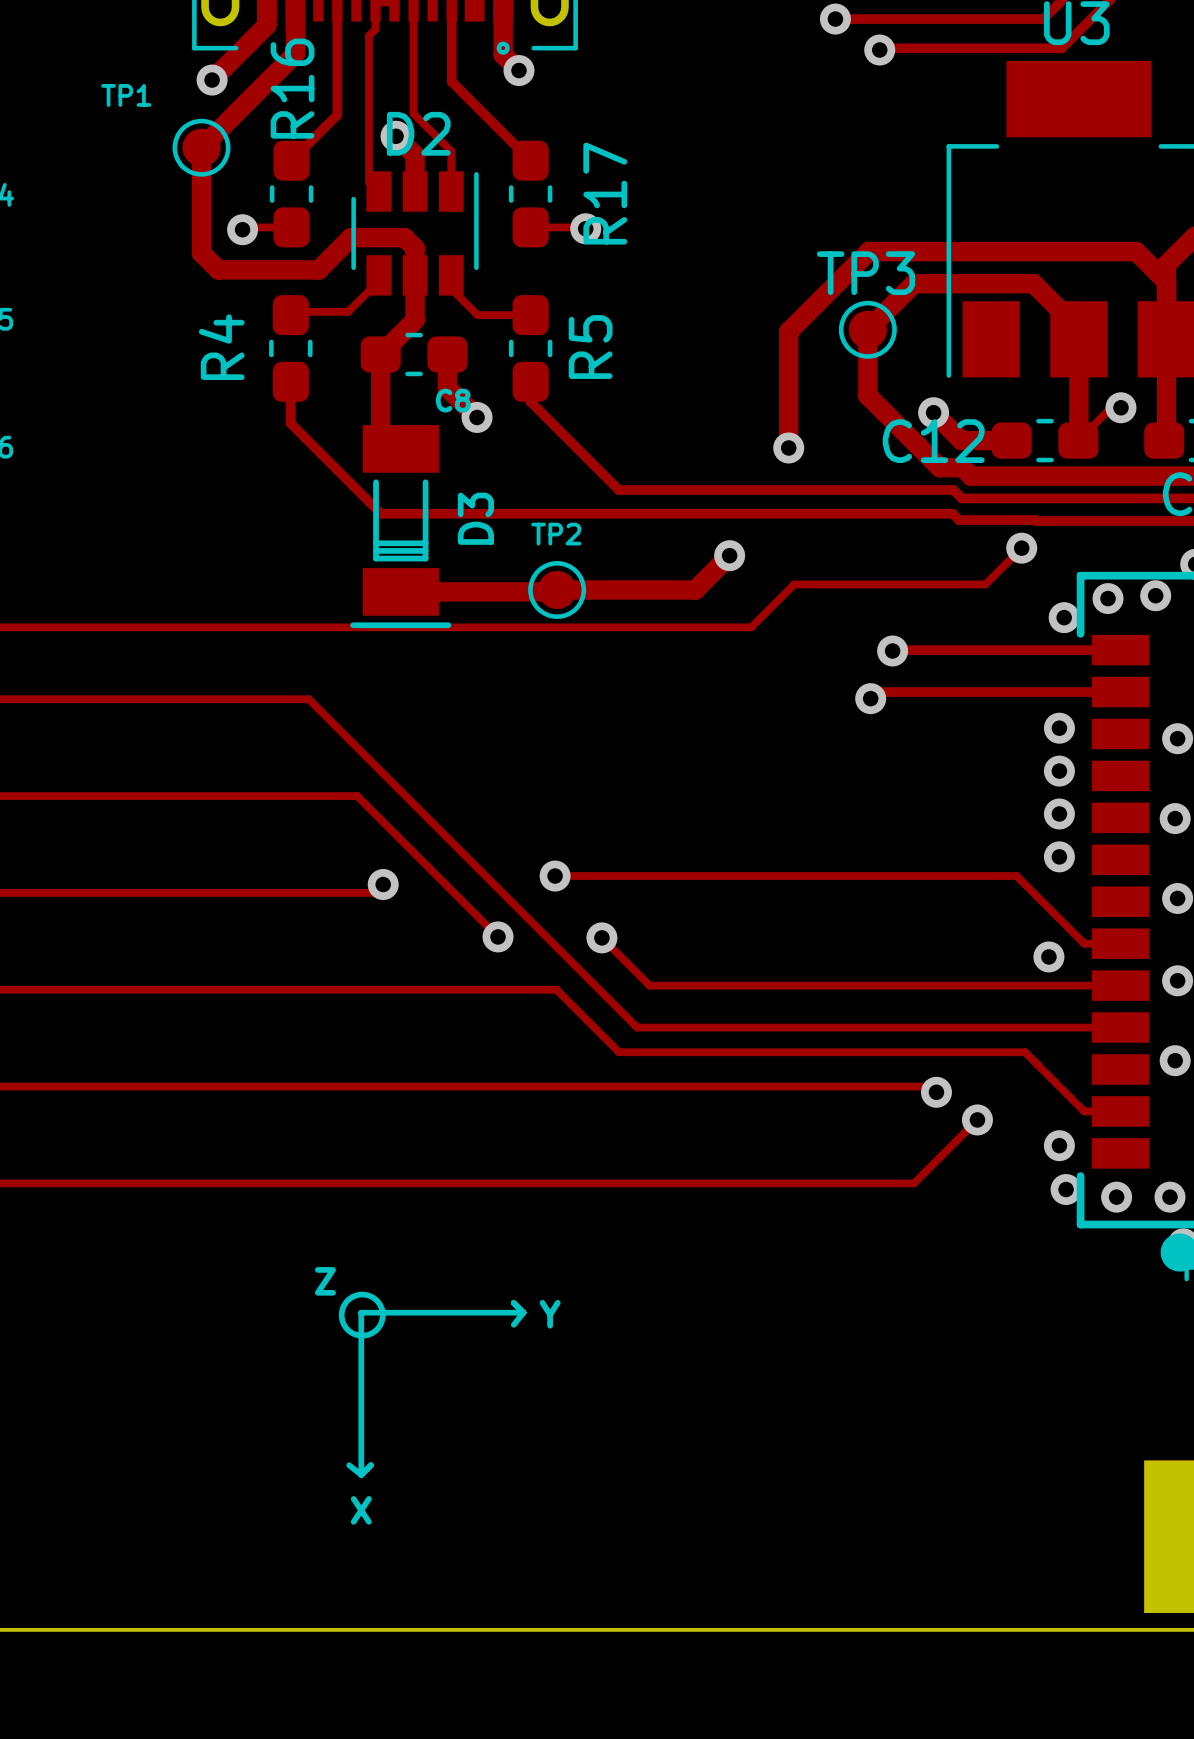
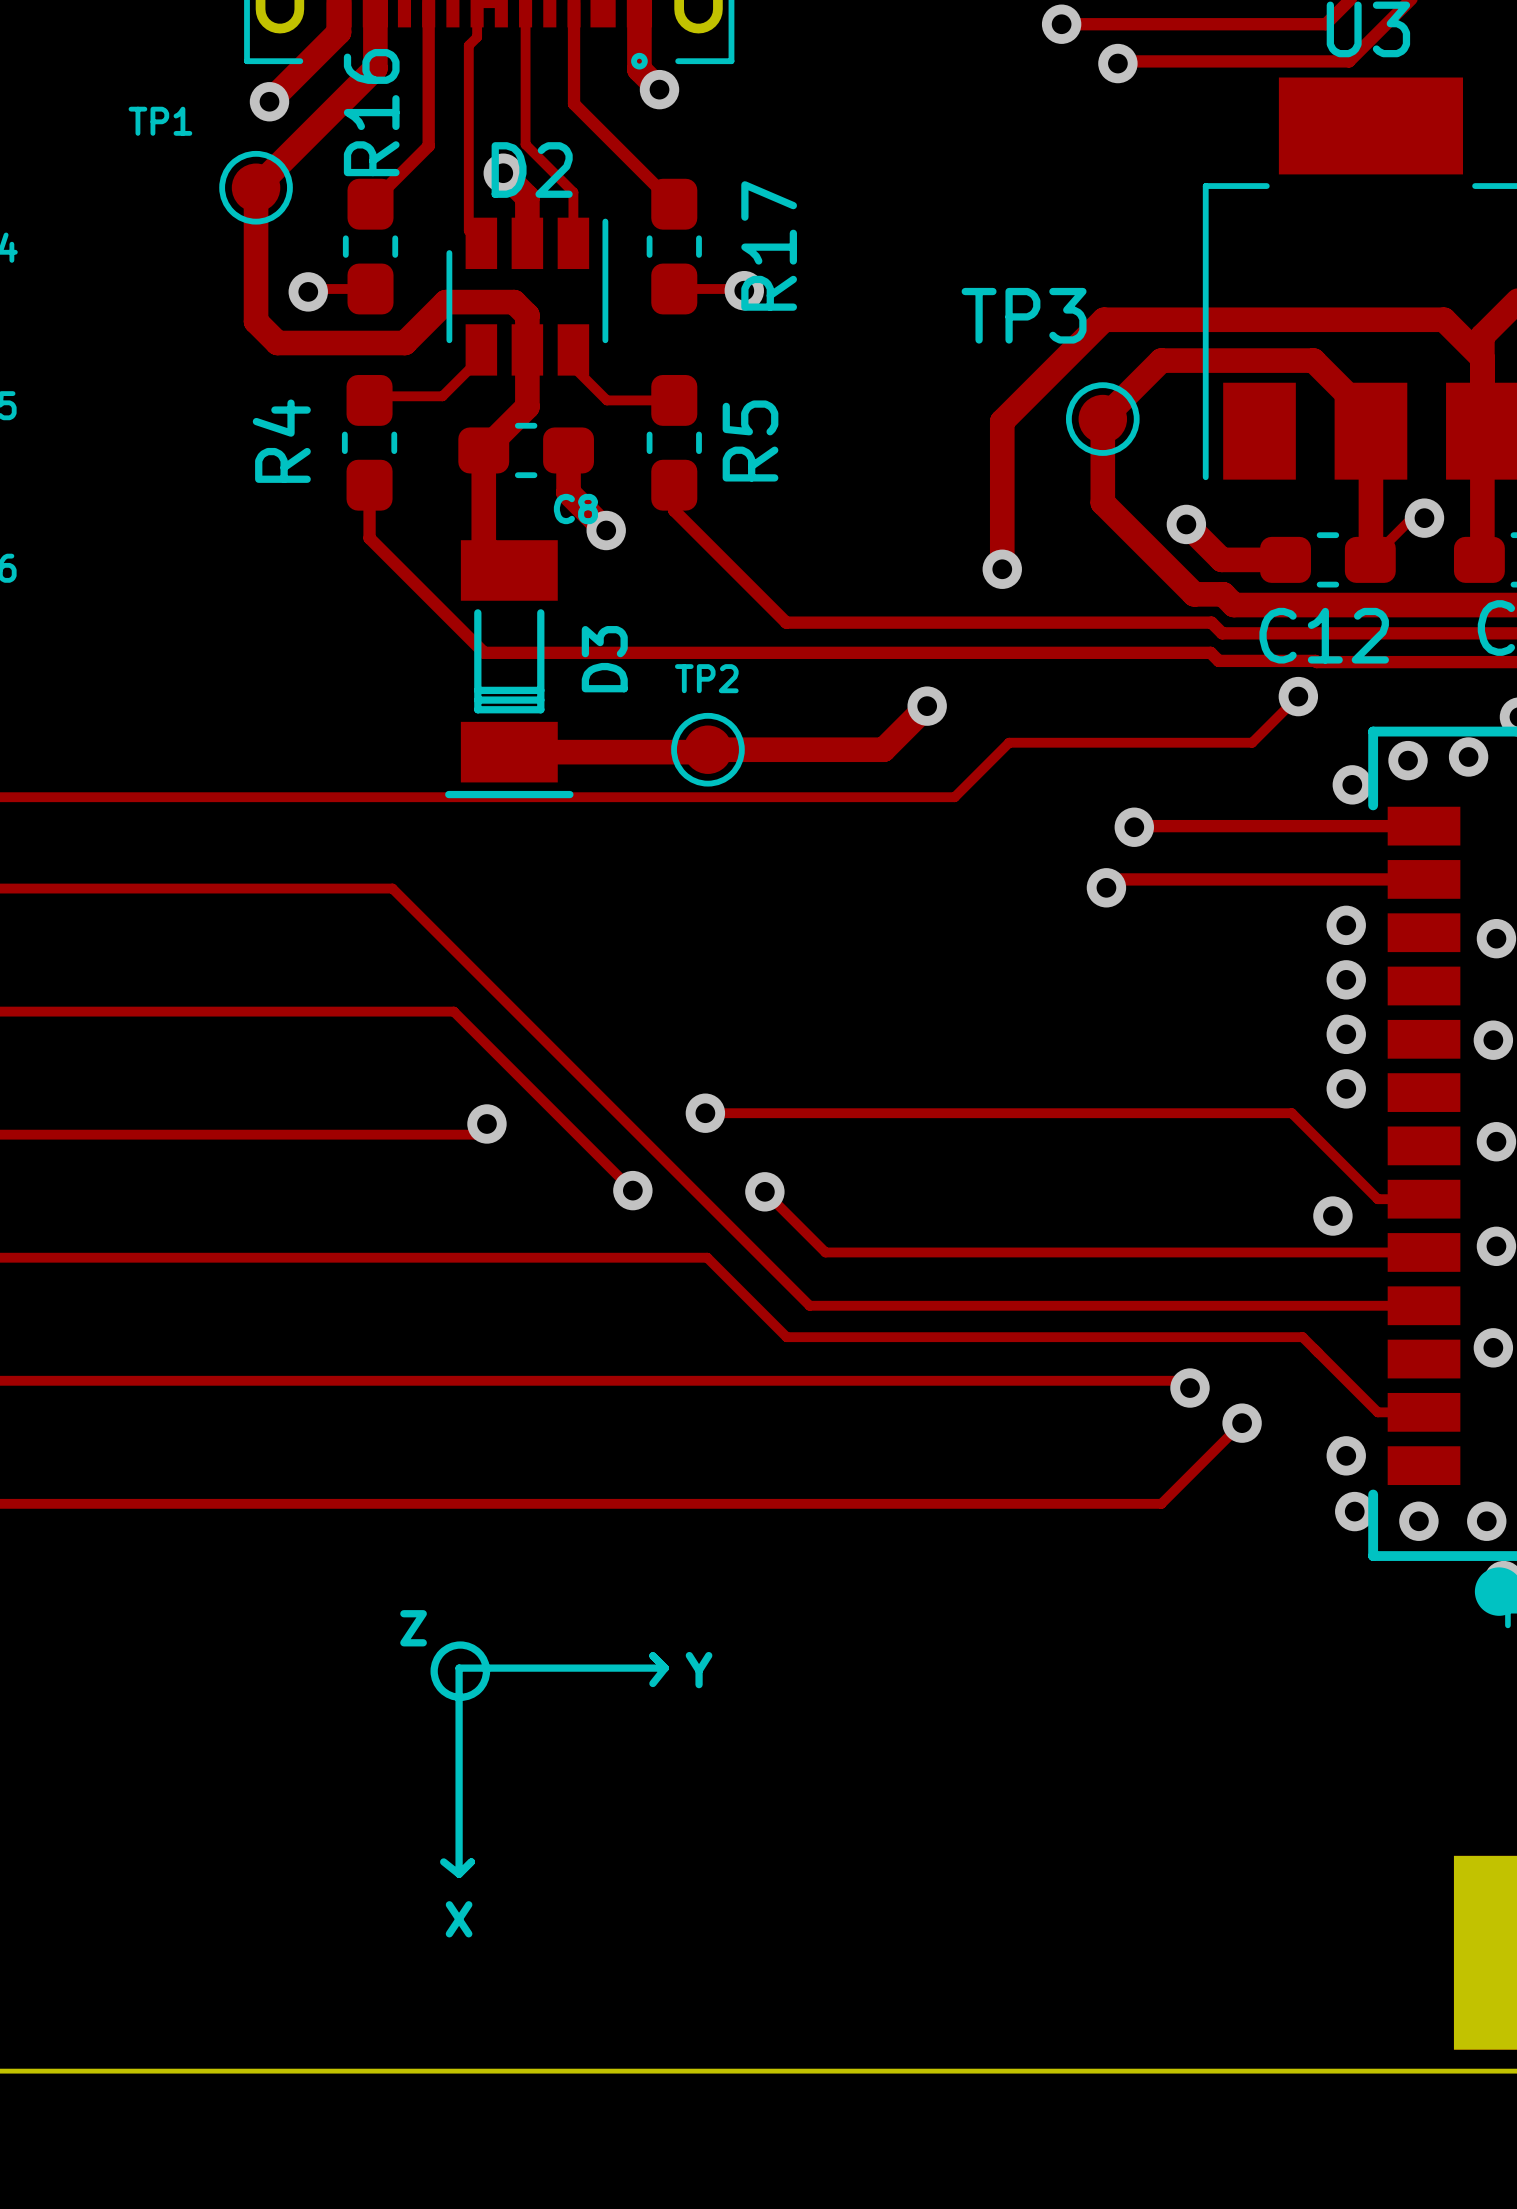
TP3 name position: TP3 (866, 273) -> TP3 (1024, 315)
C12 name position: C12 (933, 441) -> C12 (1324, 635)

